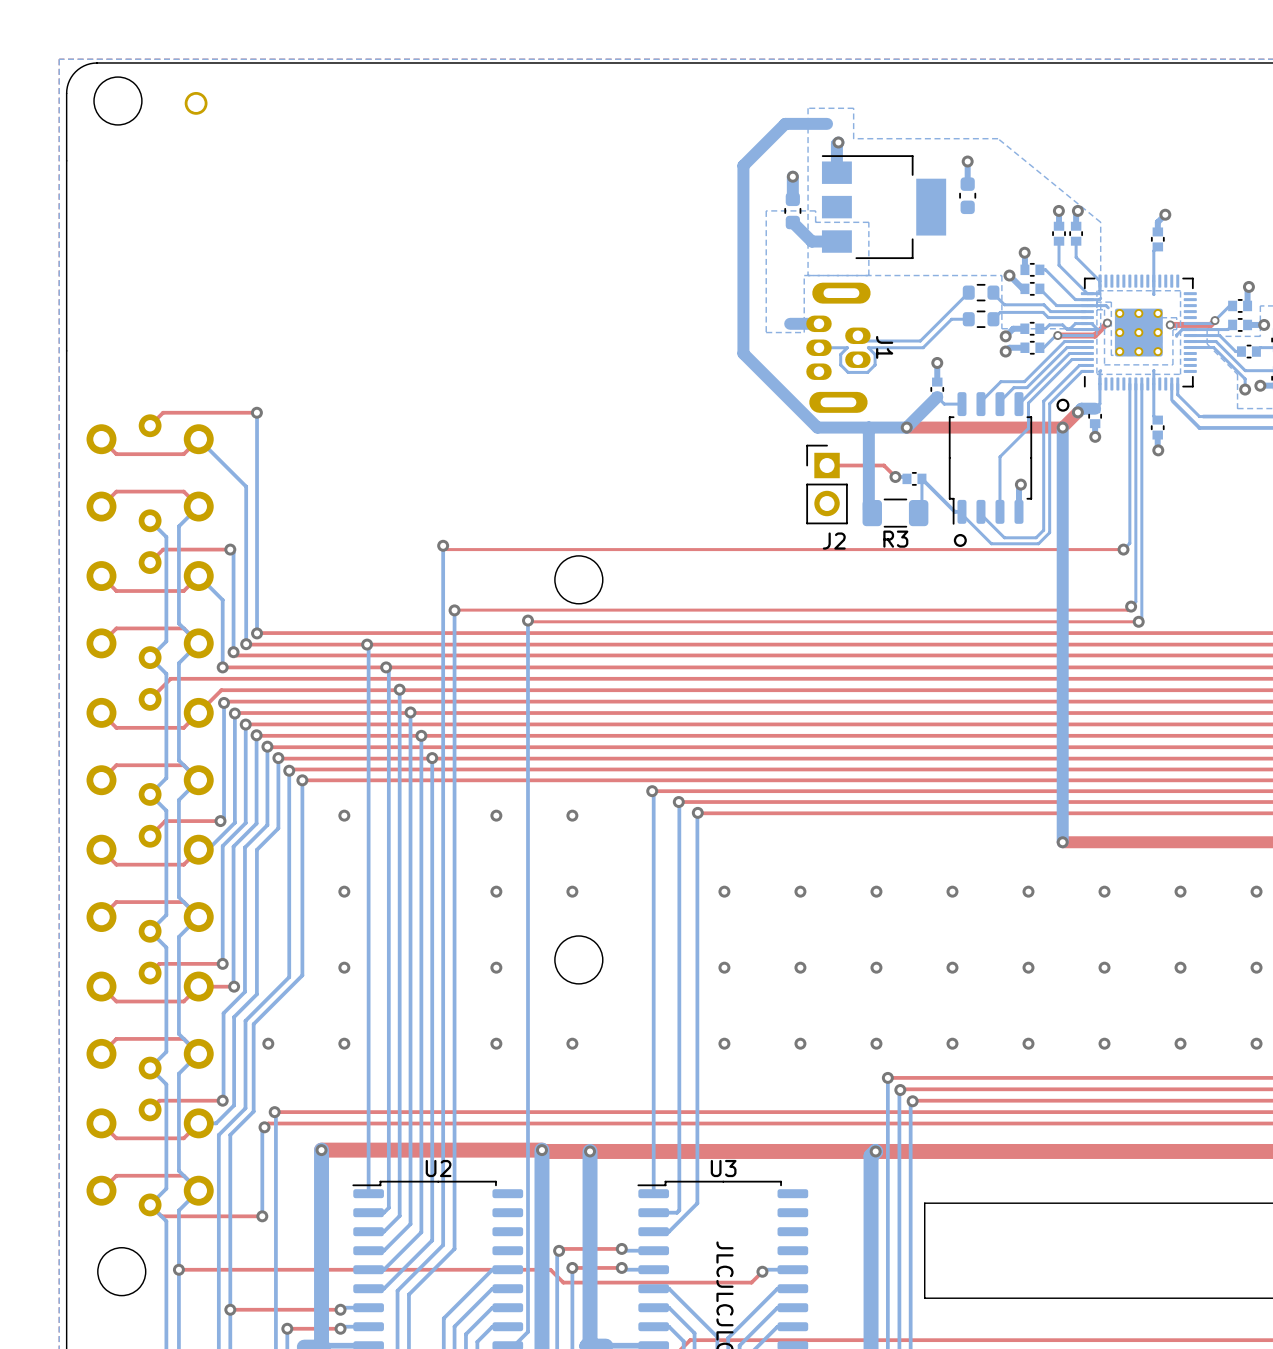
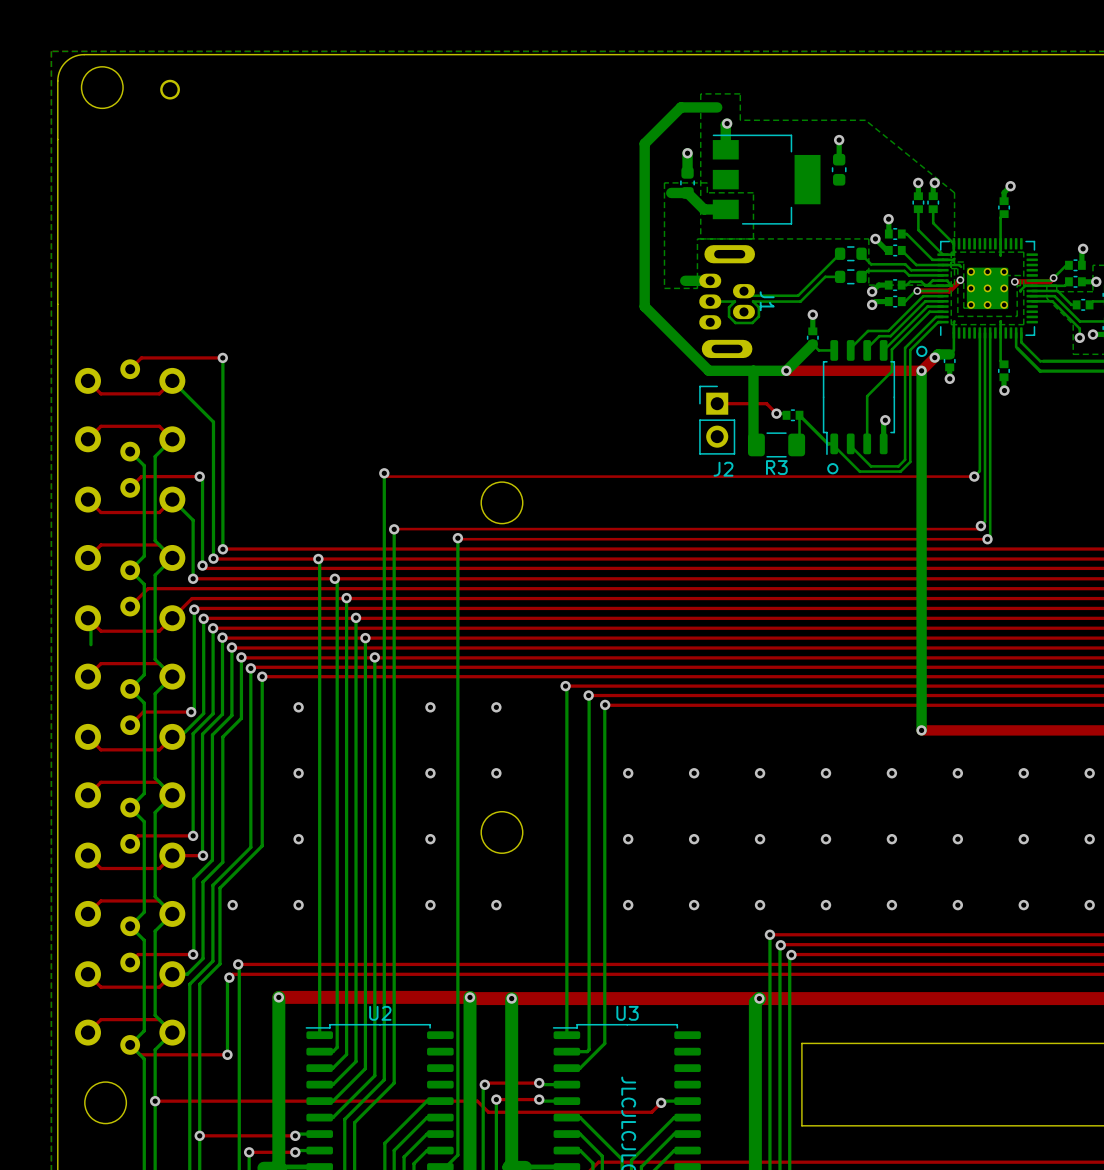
bottom track: none -> (687, 192) (671, 192)
bottom track: none -> (90, 621) (90, 644)

